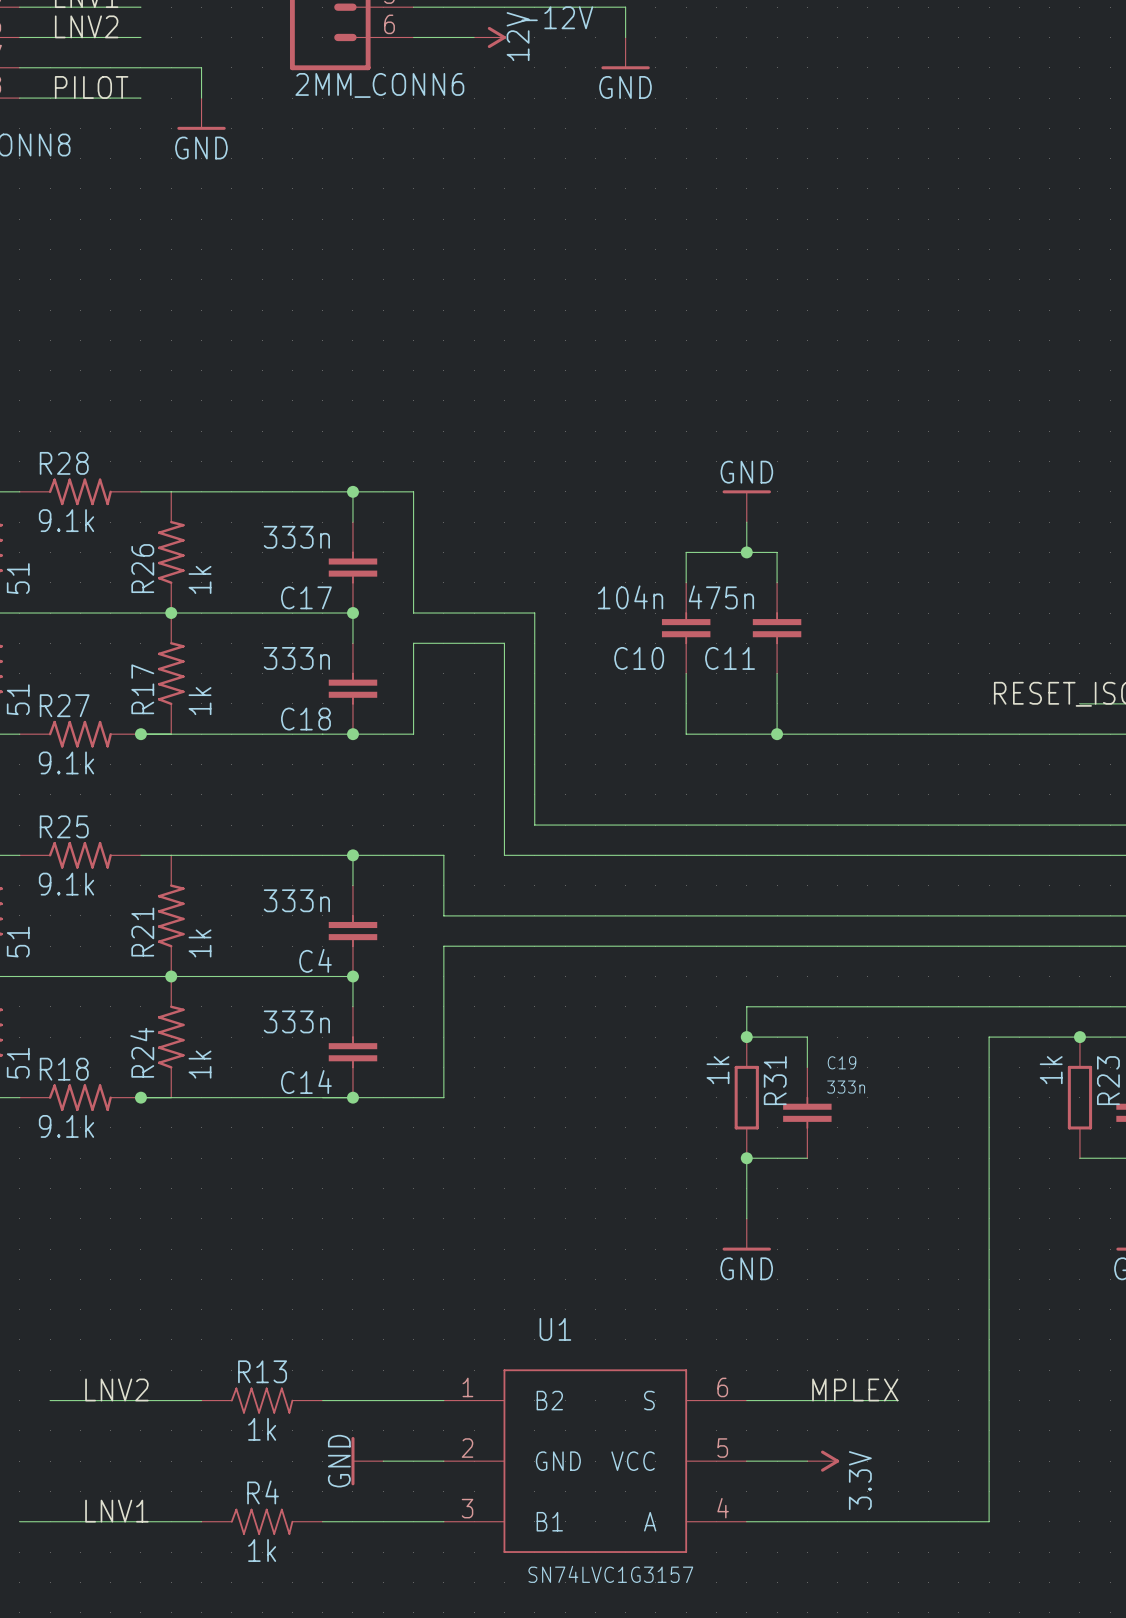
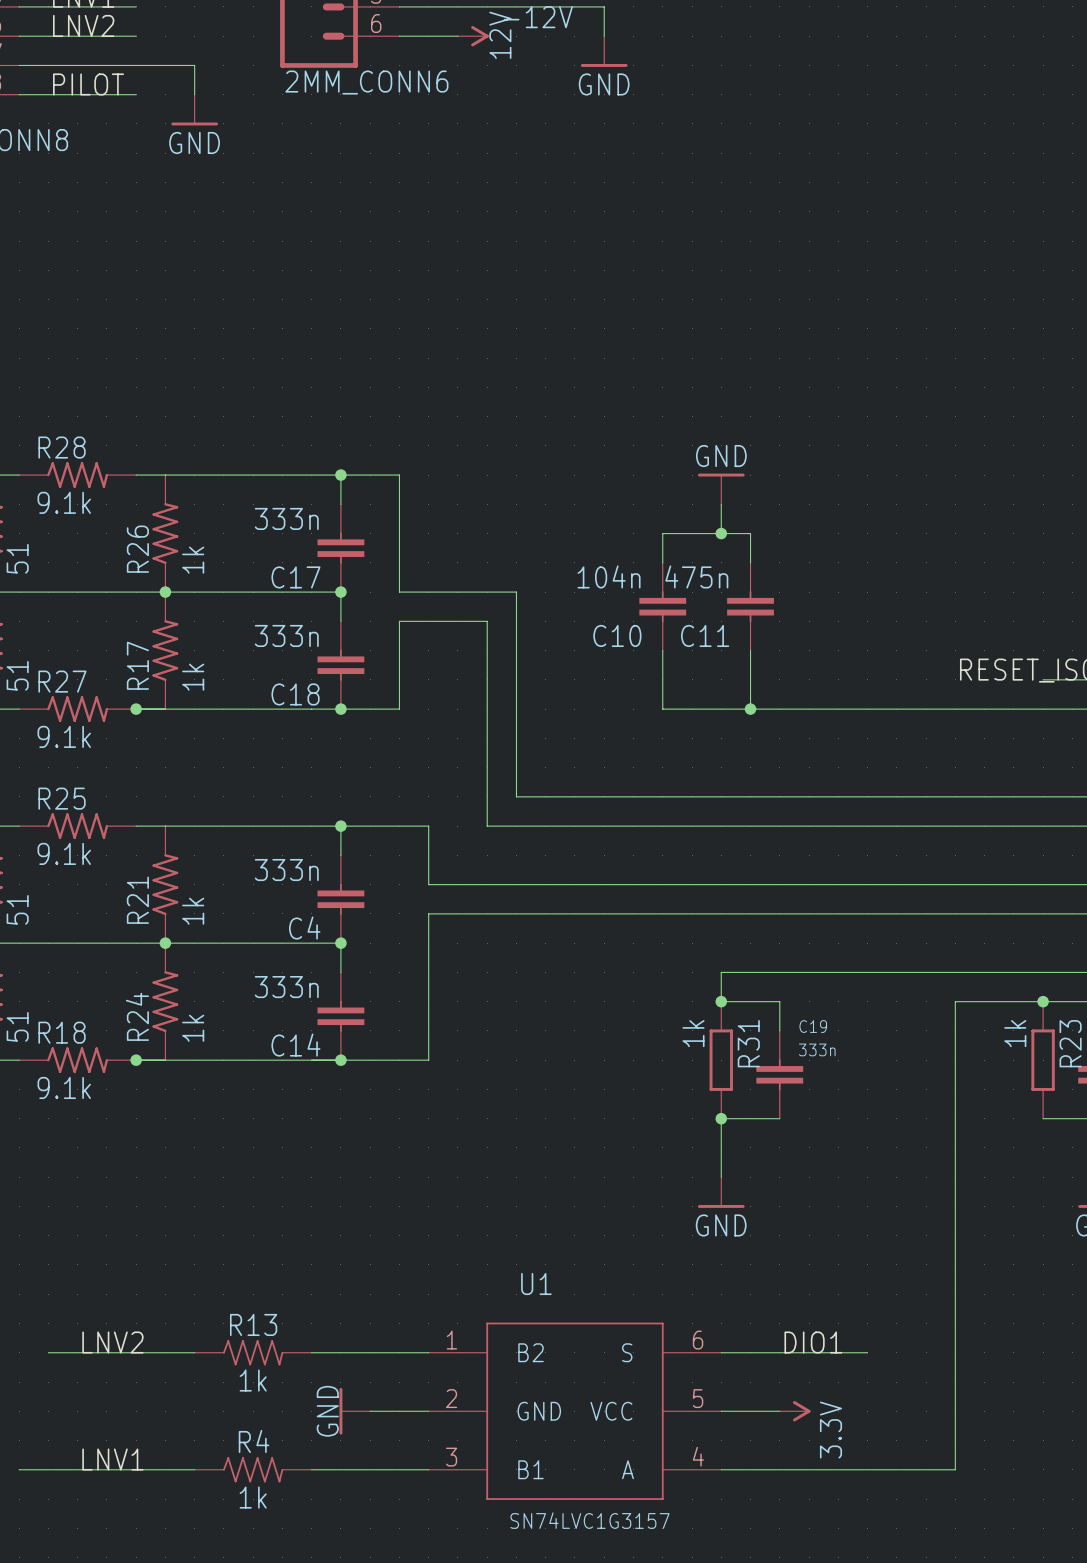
label: MPLEX (855, 1389) -> DIO1 (813, 1342)

